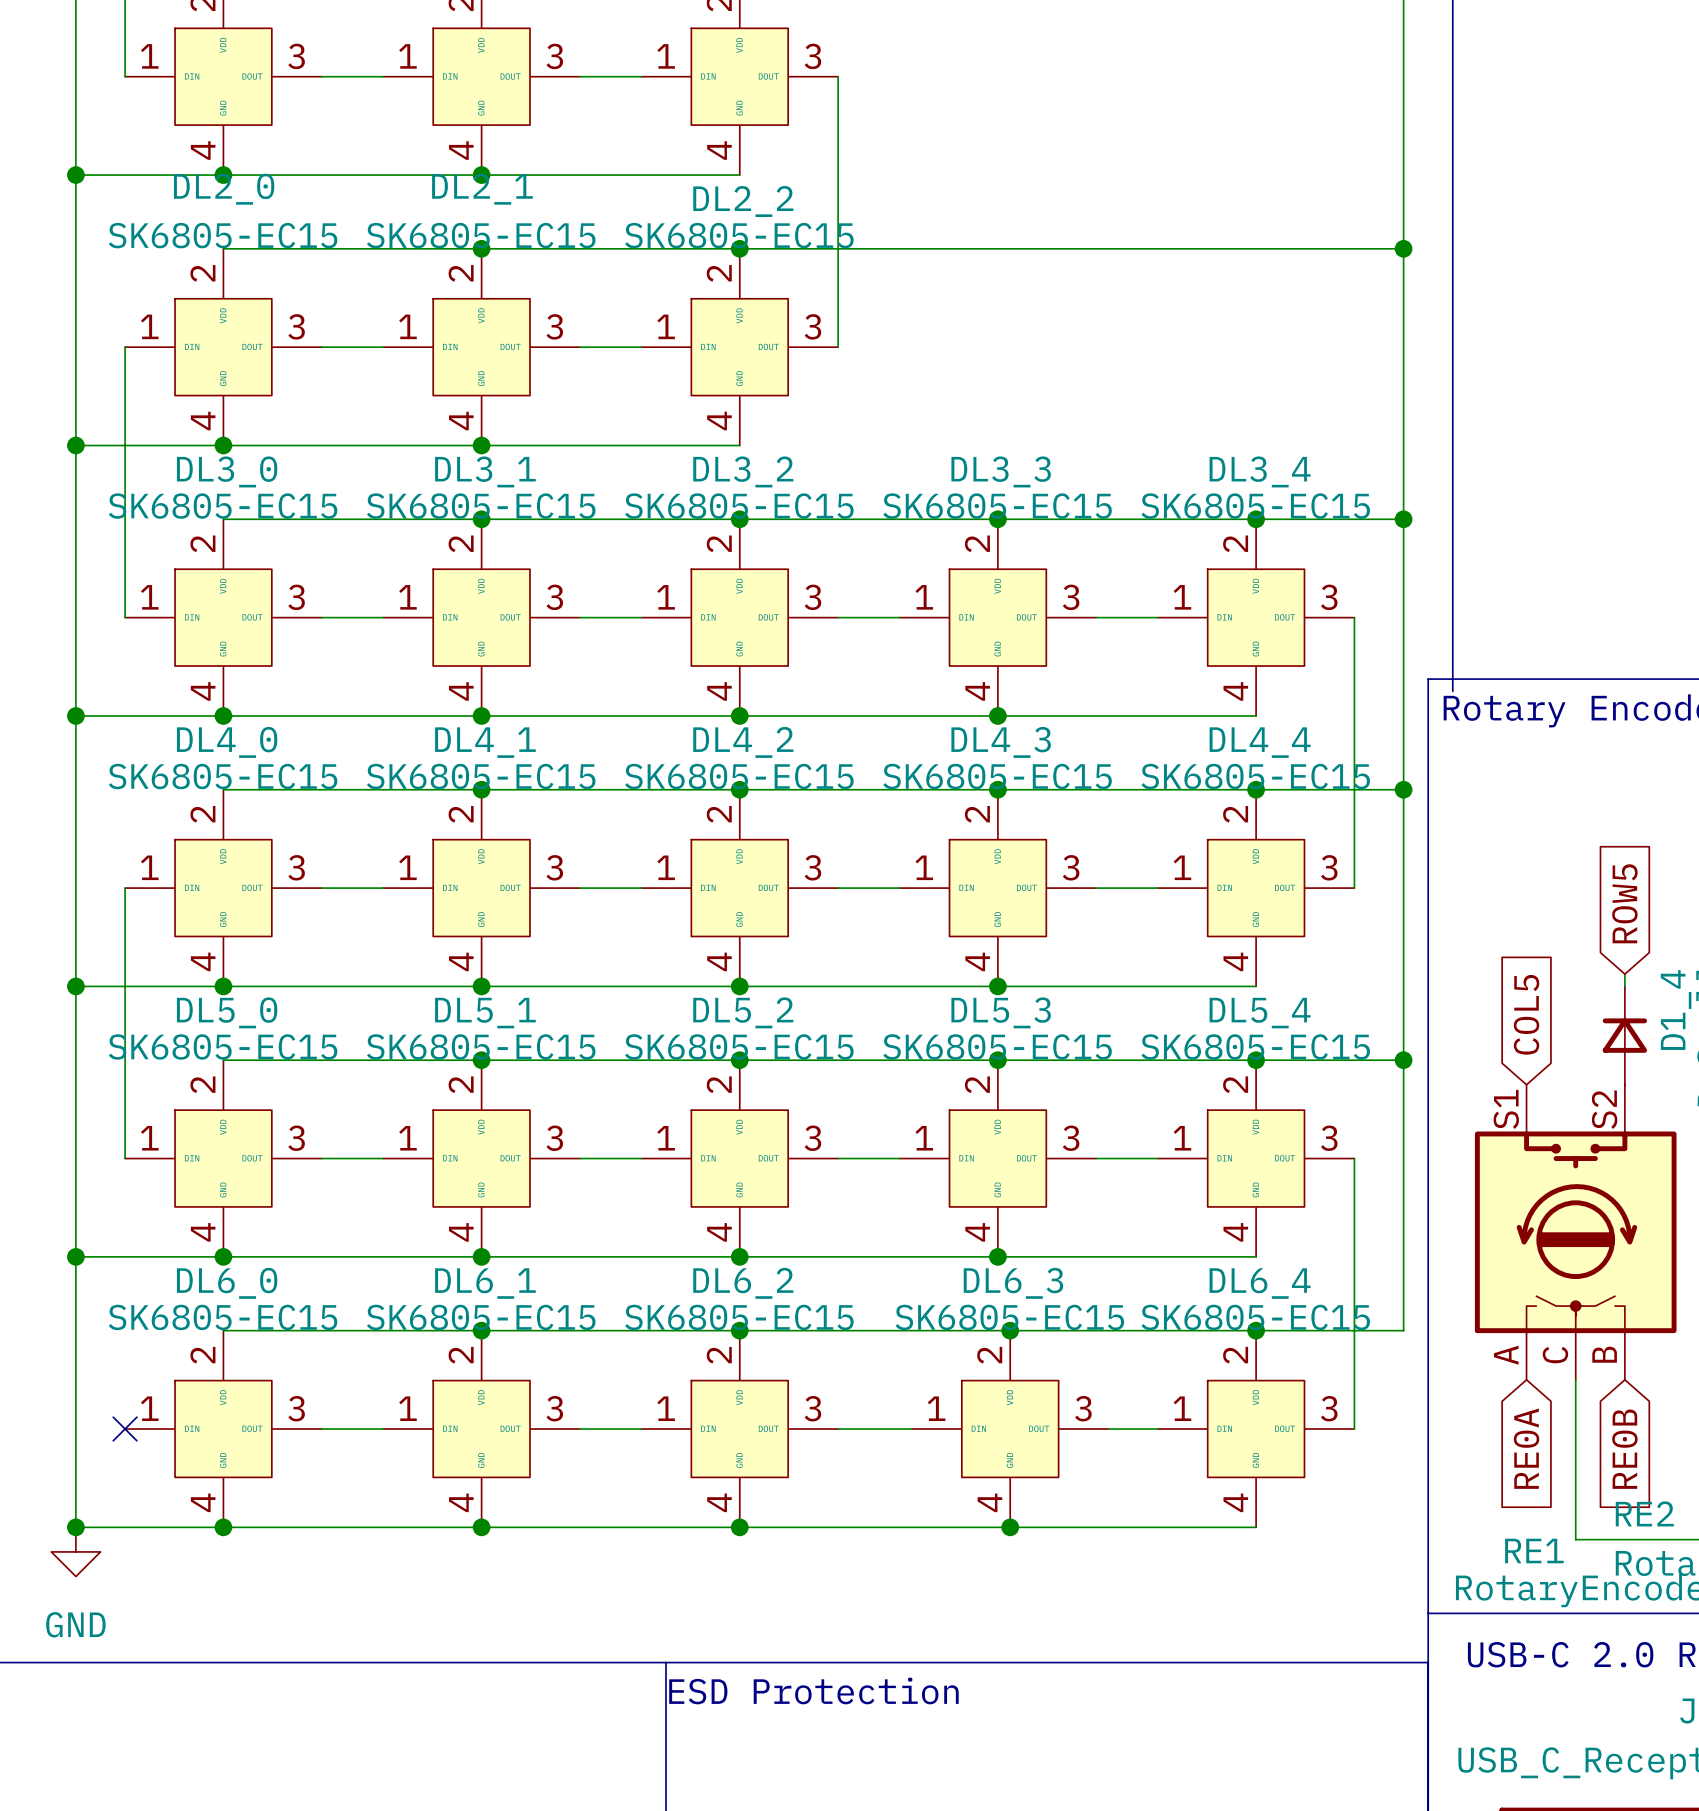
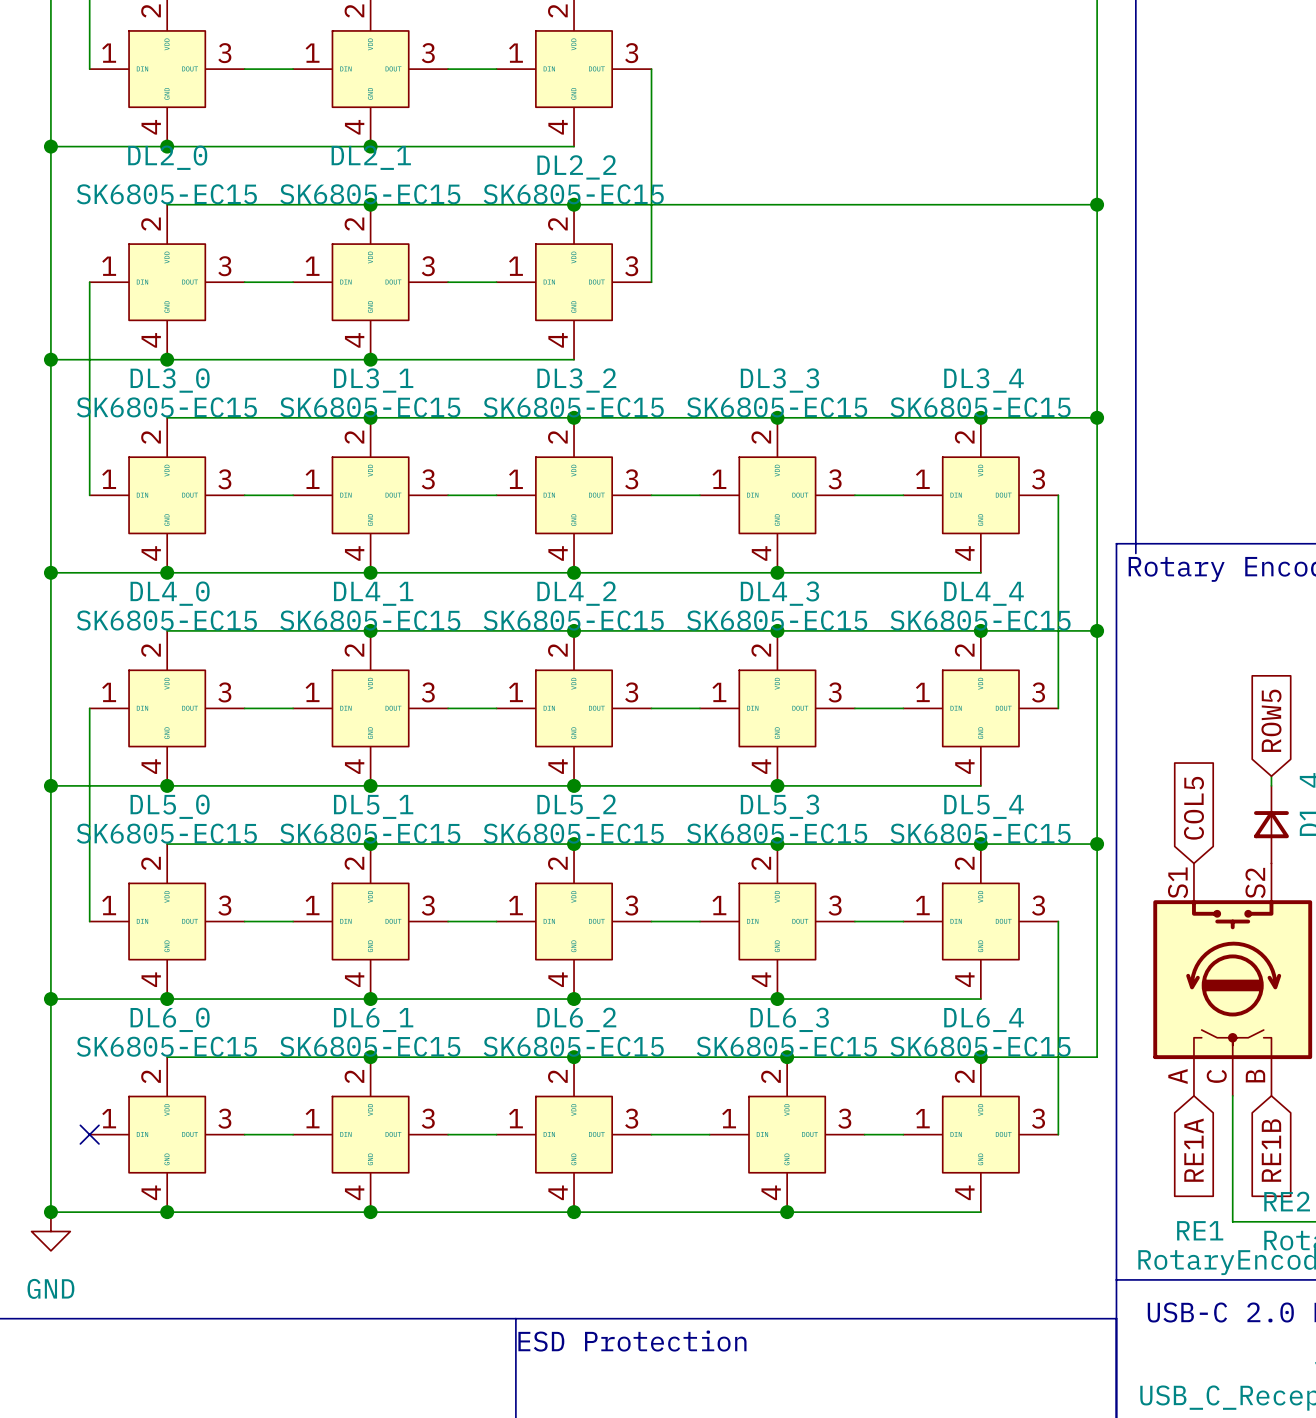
global label: RE0A (1526, 1448) -> RE1A (1193, 1150)
global label: RE0B (1624, 1449) -> RE1B (1271, 1150)

